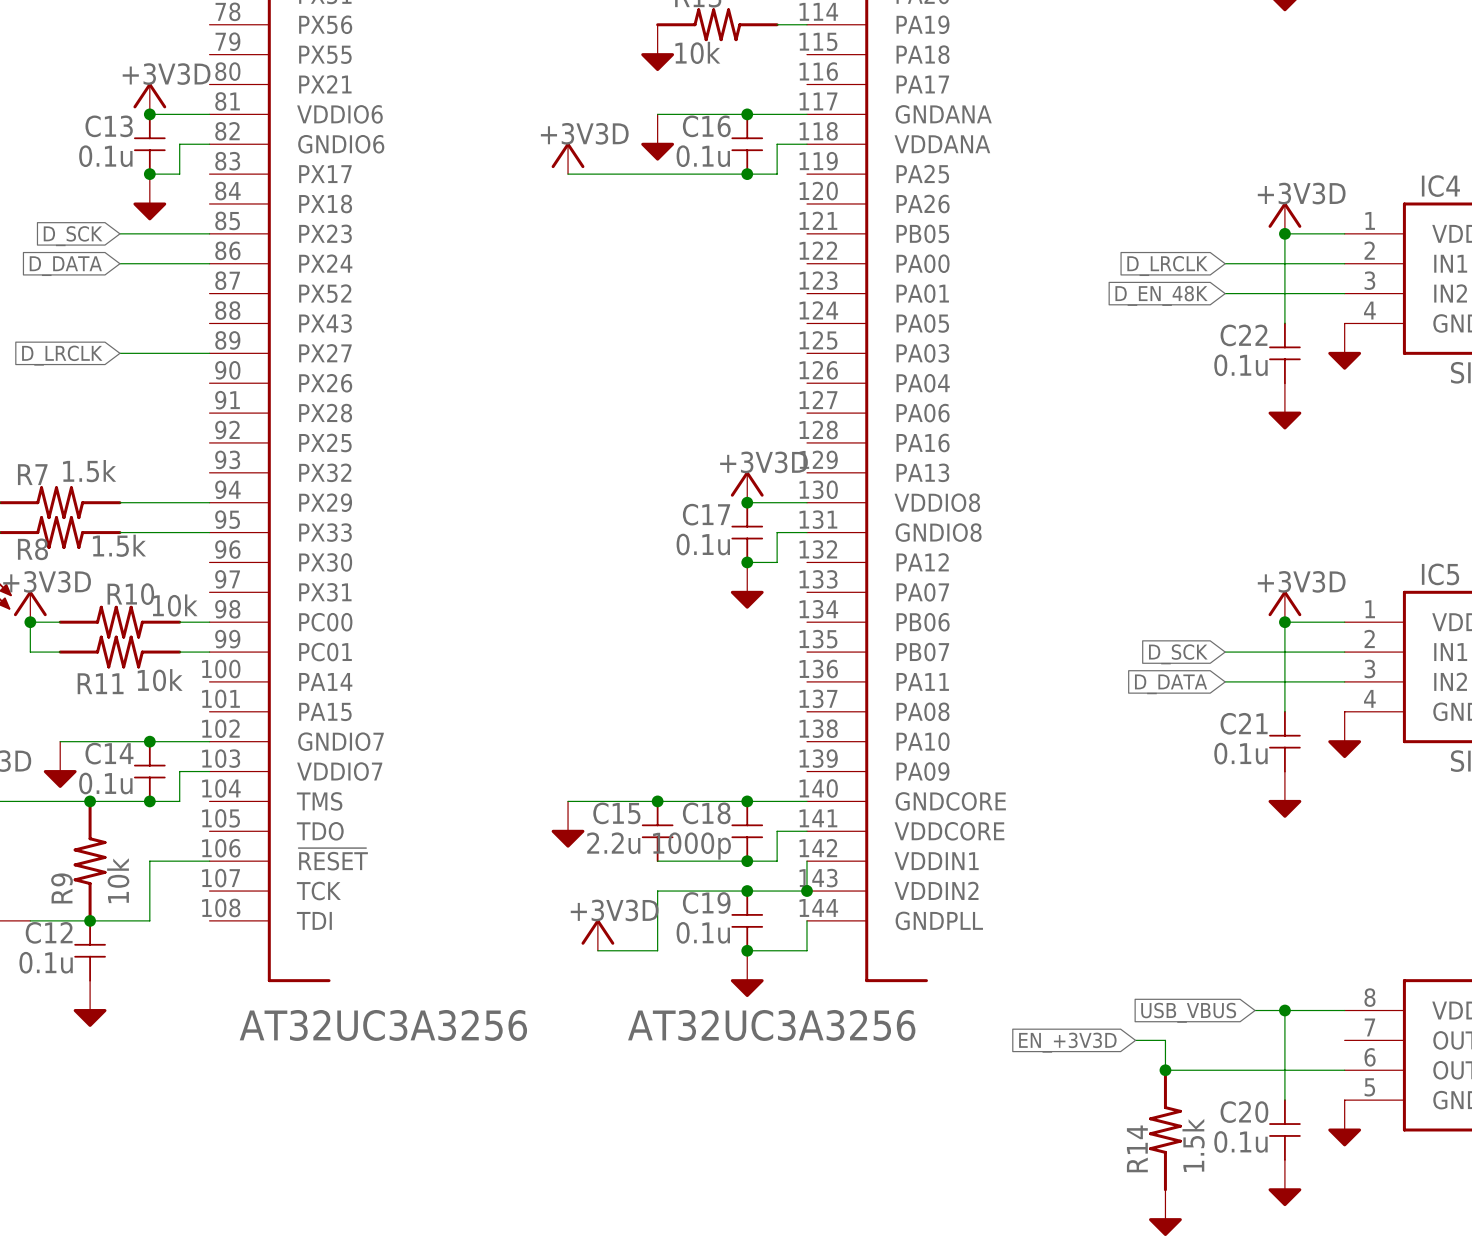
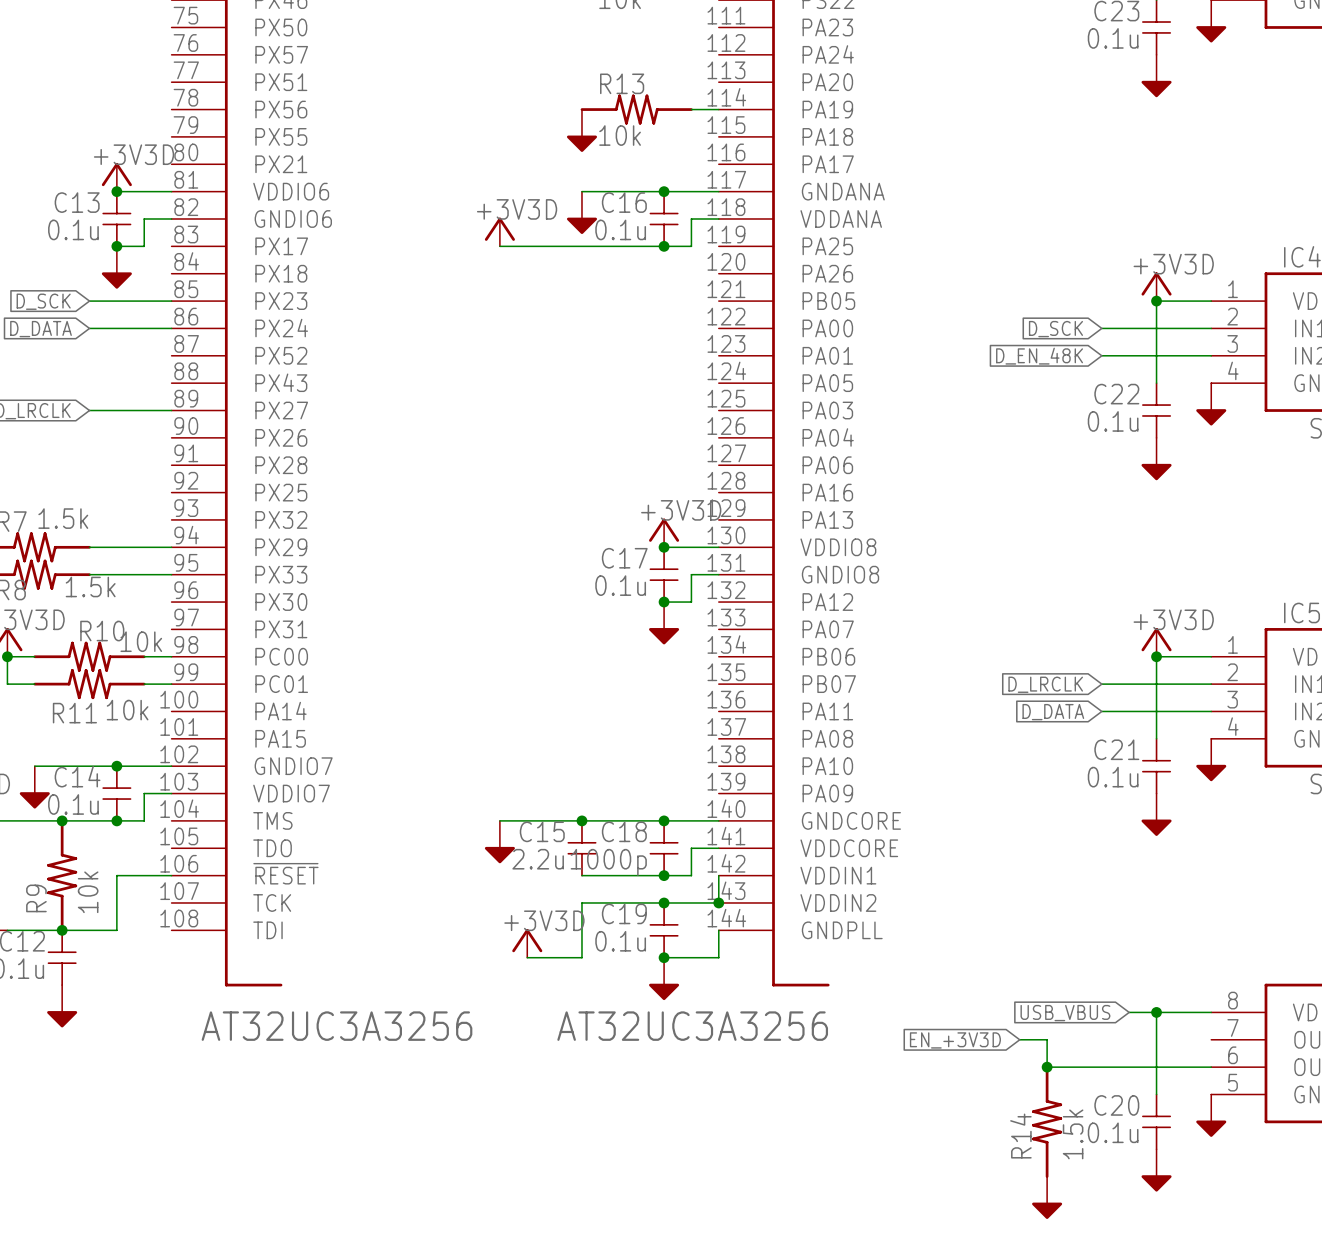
global label: D_LRCLK (1167, 266) -> D_SCK (1055, 329)
global label: D_SCK (1178, 654) -> D_LRCLK (1045, 684)

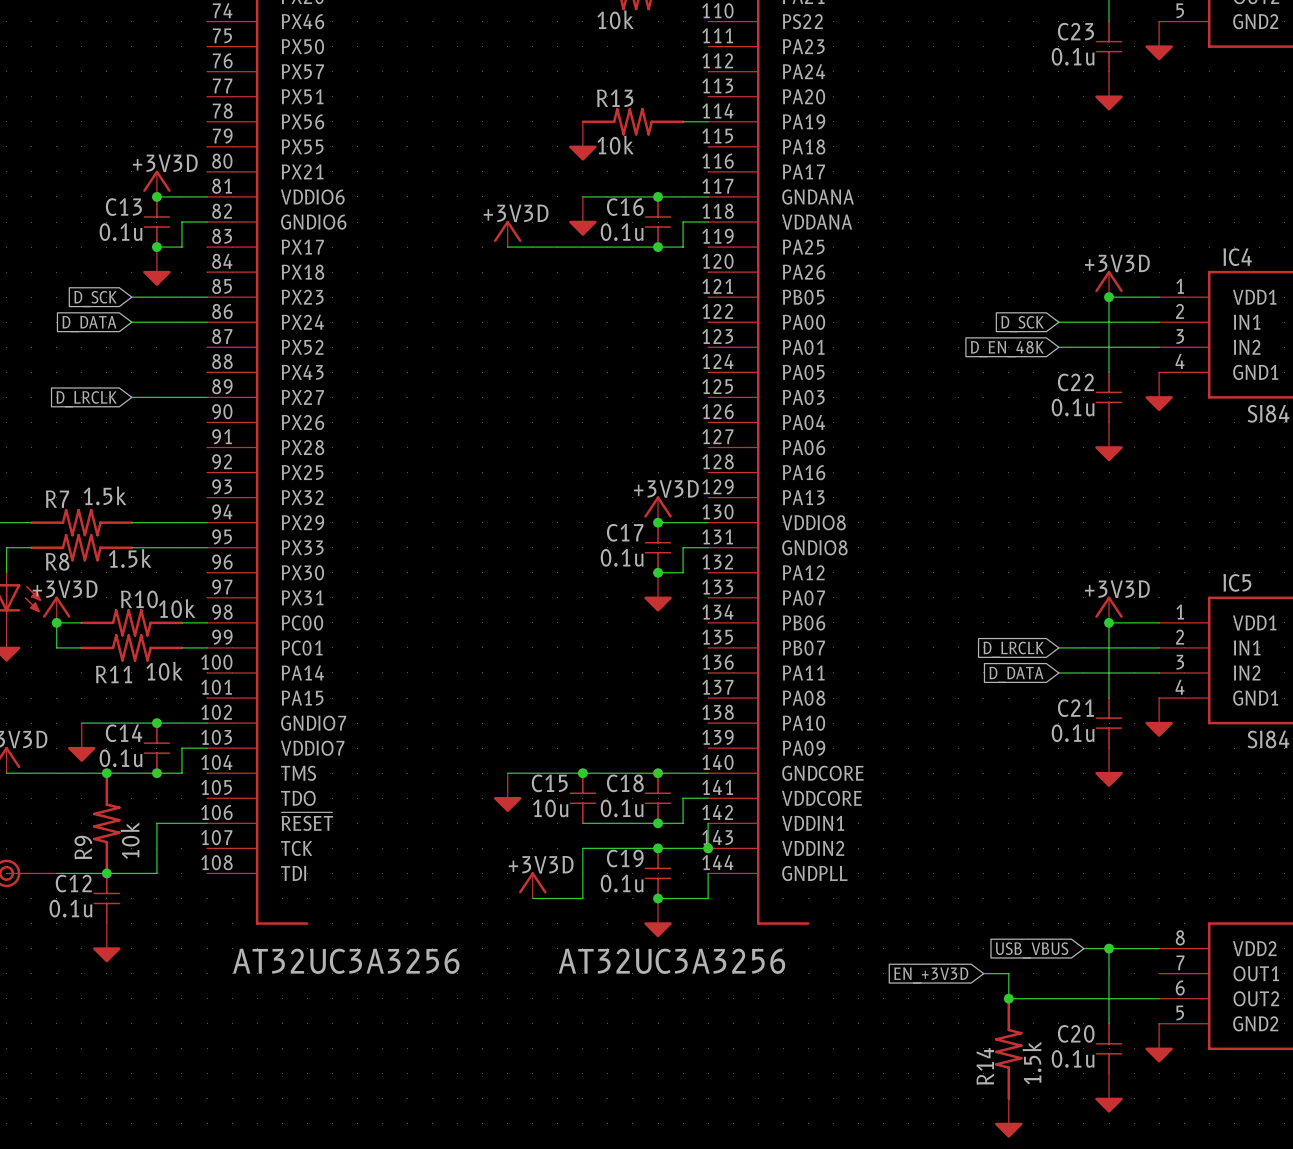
C15 value: 2.2u (538, 859) -> 10u (550, 808)
C18 value: 1000p (608, 862) -> 0.1u (622, 808)

